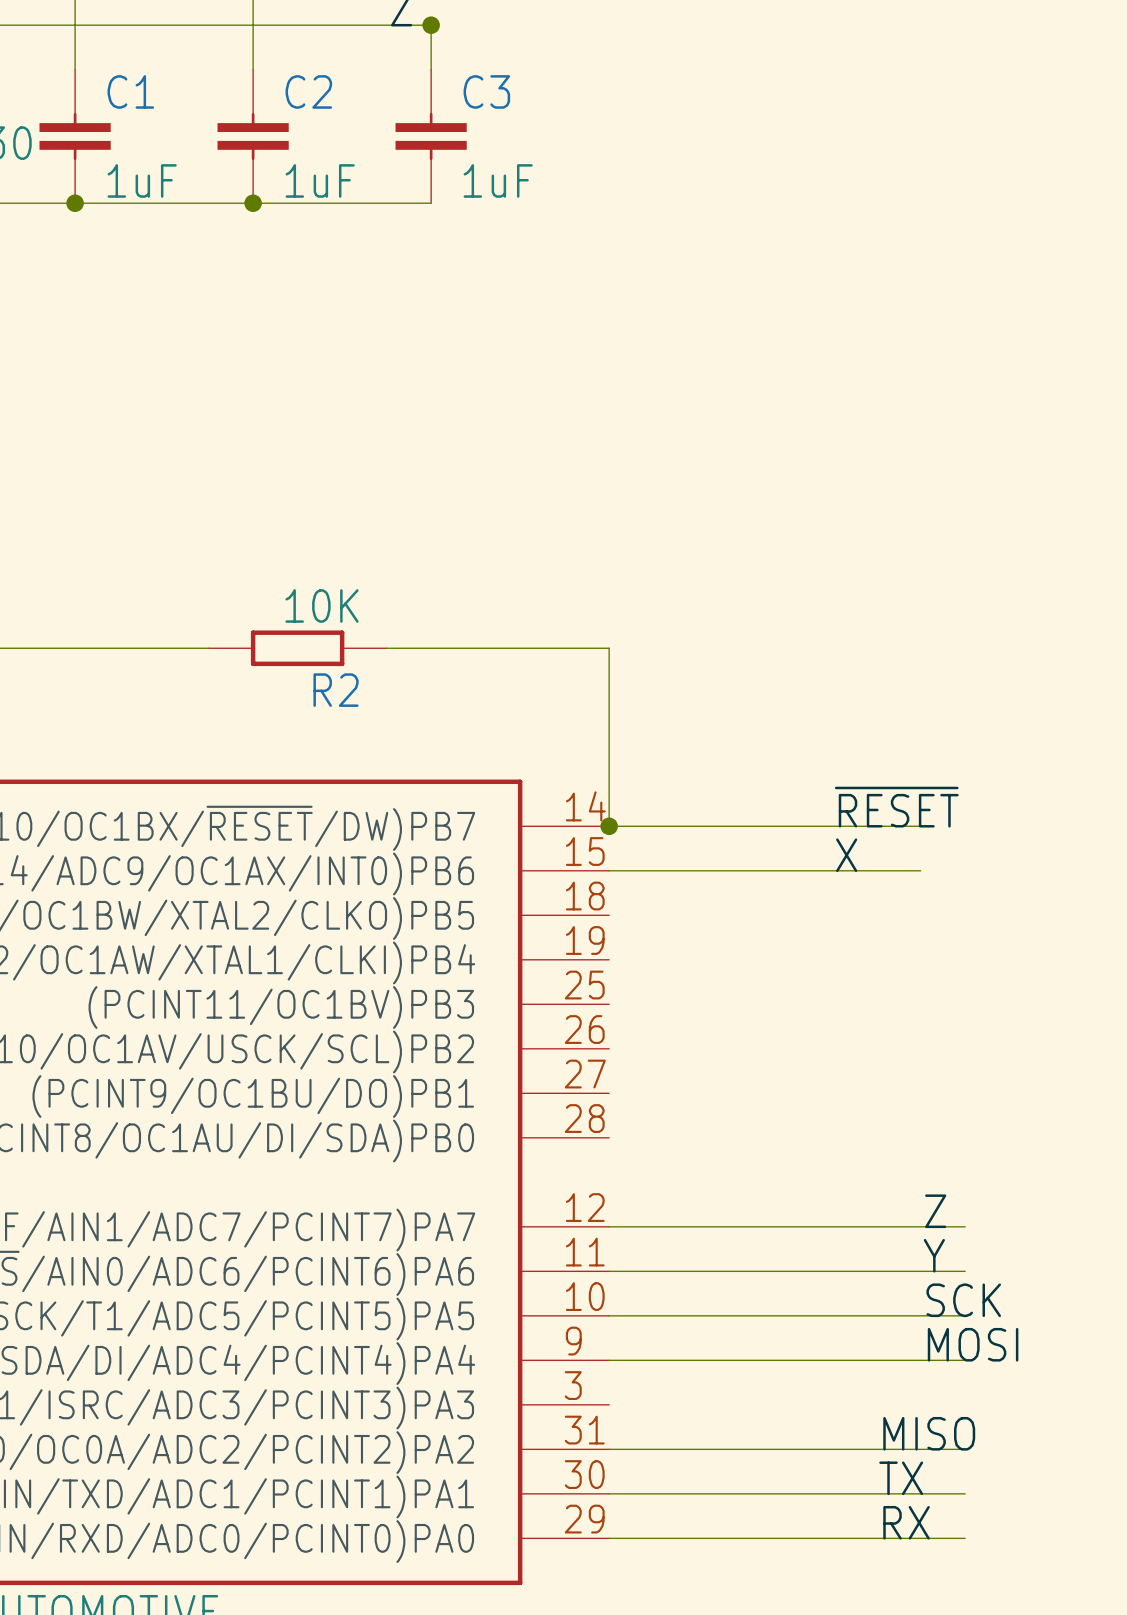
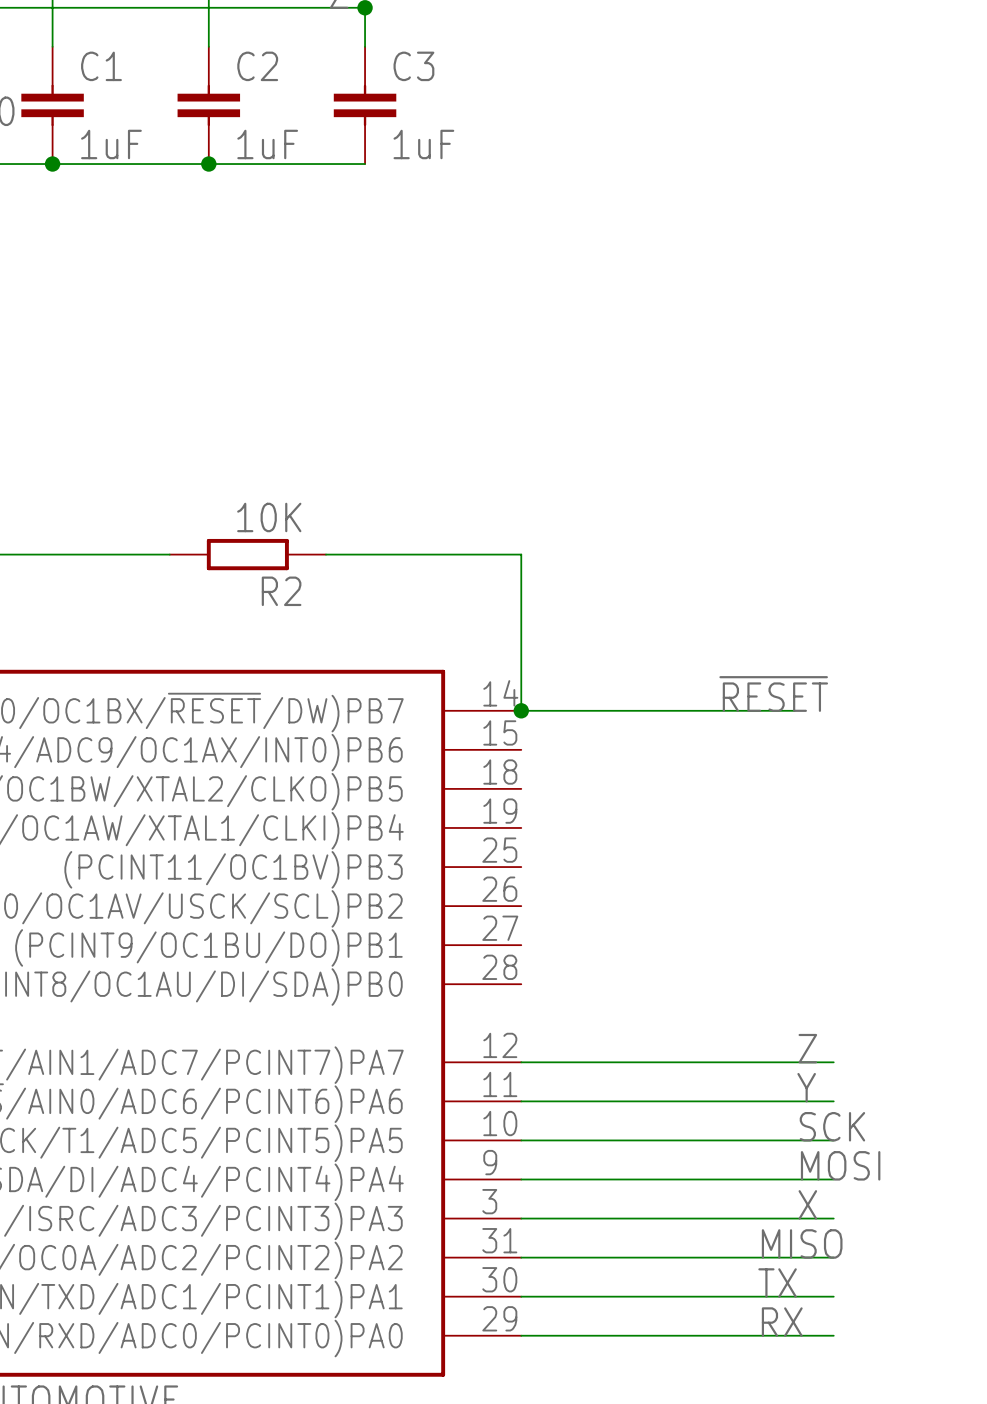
label: X (846, 855) -> none
wire: (609, 870) (920, 870) -> none
label: none -> X (807, 1204)
wire: none -> (521, 1218) (833, 1218)

